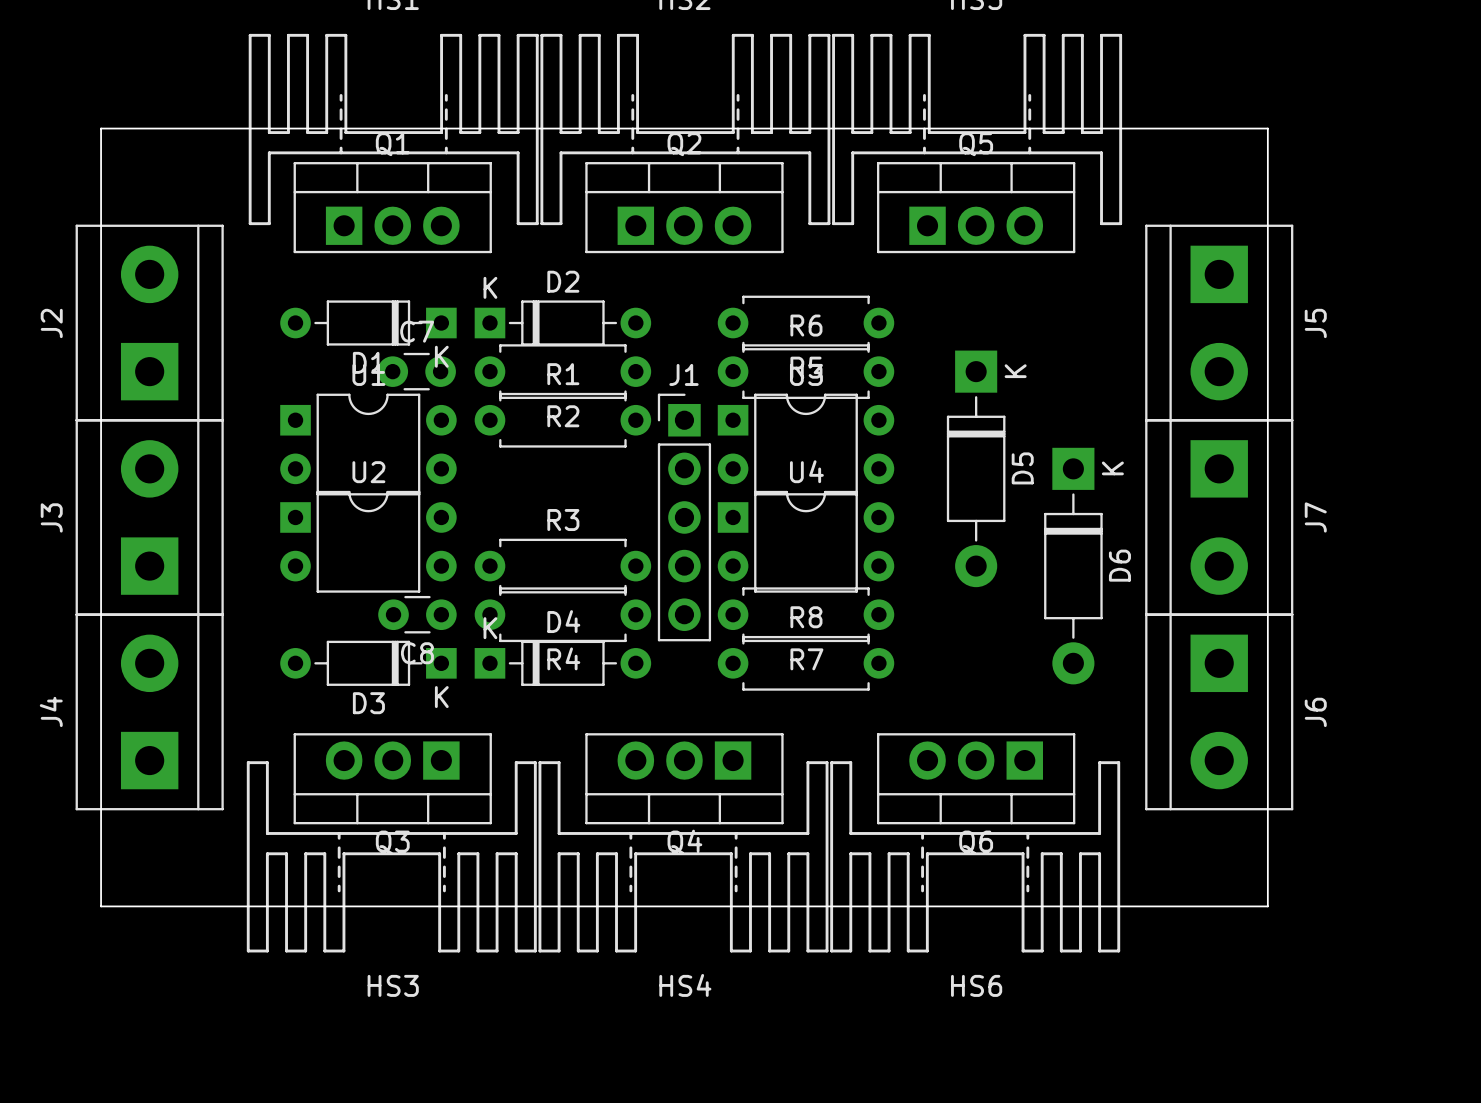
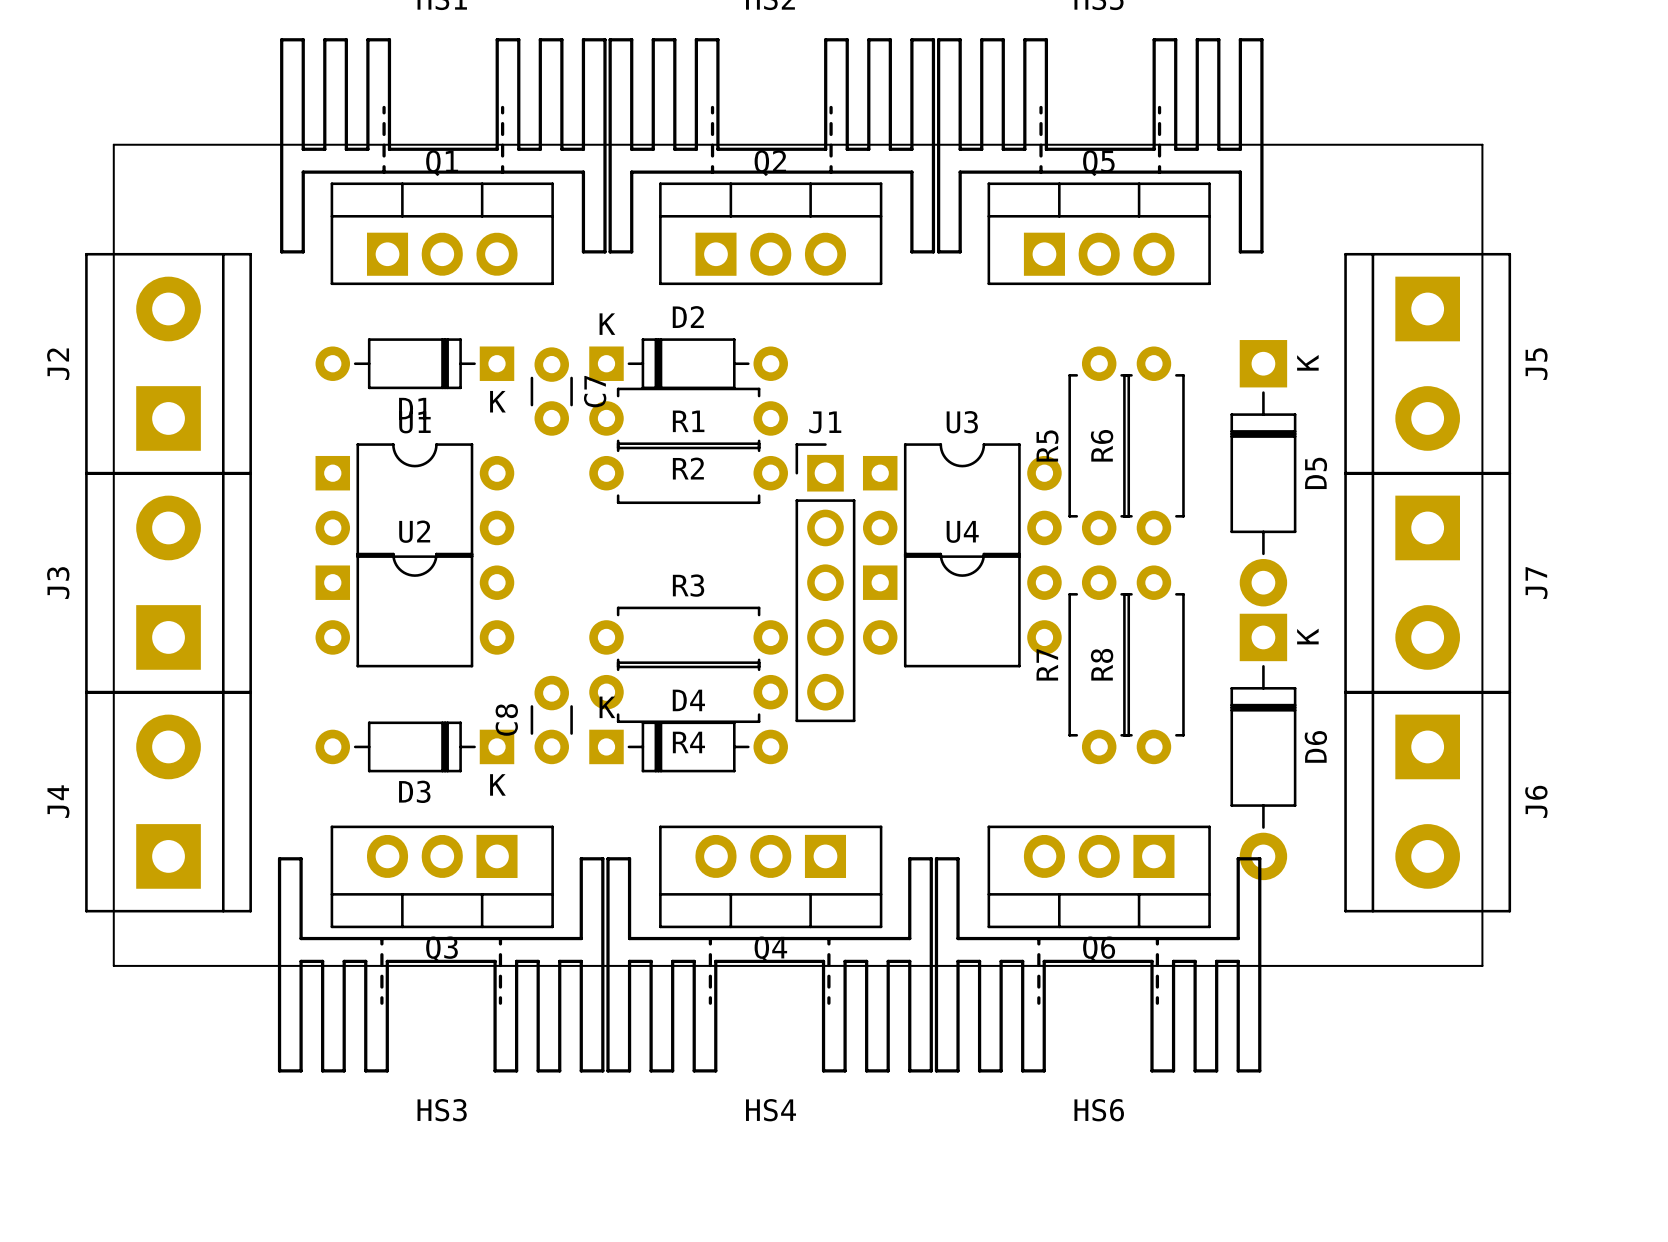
board edge: (1267, 128) (1267, 906) (101, 906) (101, 857) -> (1427, 144) (1482, 144) (1482, 965) (113, 965)
D2 position: (562, 323) -> (688, 363)
R5 rotation: 0° (805, 323) -> 90° clockwise (1099, 445)
R5 position: (805, 323) -> (1099, 445)
J5 position: (1219, 323) -> (1427, 363)
R6 name position: R6 (806, 325) -> R6 (1102, 445)
C7 rotation: 0° (416, 371) -> 90° clockwise (551, 391)
C7 position: (416, 371) -> (551, 391)
R2 position: (562, 371) -> (688, 418)
R6 rotation: 0° (805, 371) -> 90° clockwise (1153, 445)
R6 position: (805, 371) -> (1153, 445)
R1 position: (562, 420) -> (688, 473)
U3 position: (805, 444) -> (962, 500)
D5 position: (976, 468) -> (1263, 473)
J1 position: (684, 517) -> (825, 582)
J7 position: (1219, 517) -> (1427, 582)
U4 position: (805, 541) -> (962, 610)
R3 position: (562, 566) -> (688, 637)
D6 position: (1073, 566) -> (1263, 746)
C8 rotation: 0° (417, 614) -> 90° clockwise (551, 720)
C8 position: (417, 614) -> (551, 720)
R4 position: (562, 614) -> (688, 692)
R7 rotation: 0° (805, 614) -> 90° clockwise (1099, 664)
R7 position: (805, 614) -> (1099, 664)
R8 name position: R8 (806, 617) -> R8 (1102, 664)
D4 position: (562, 663) -> (688, 746)
R8 rotation: 0° (805, 663) -> 90° clockwise (1153, 664)
R8 position: (805, 663) -> (1153, 664)
J6 position: (1219, 711) -> (1427, 801)

